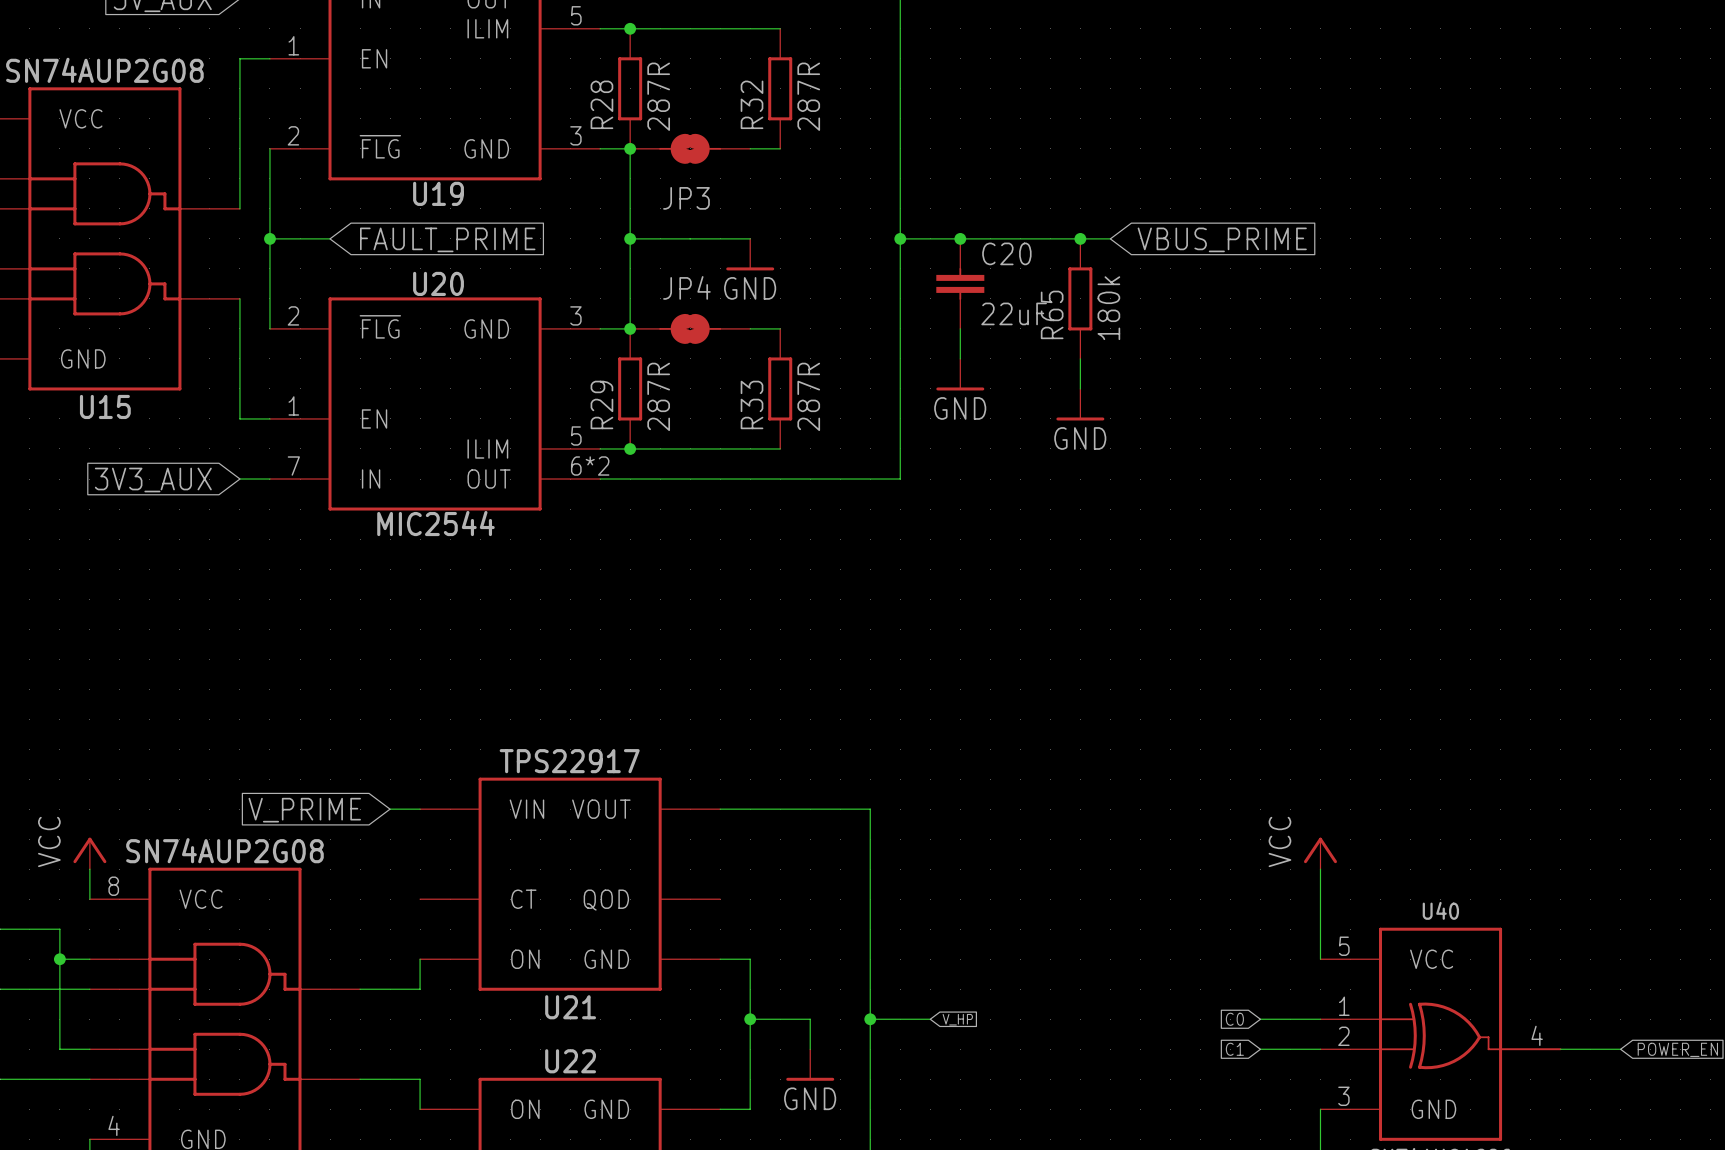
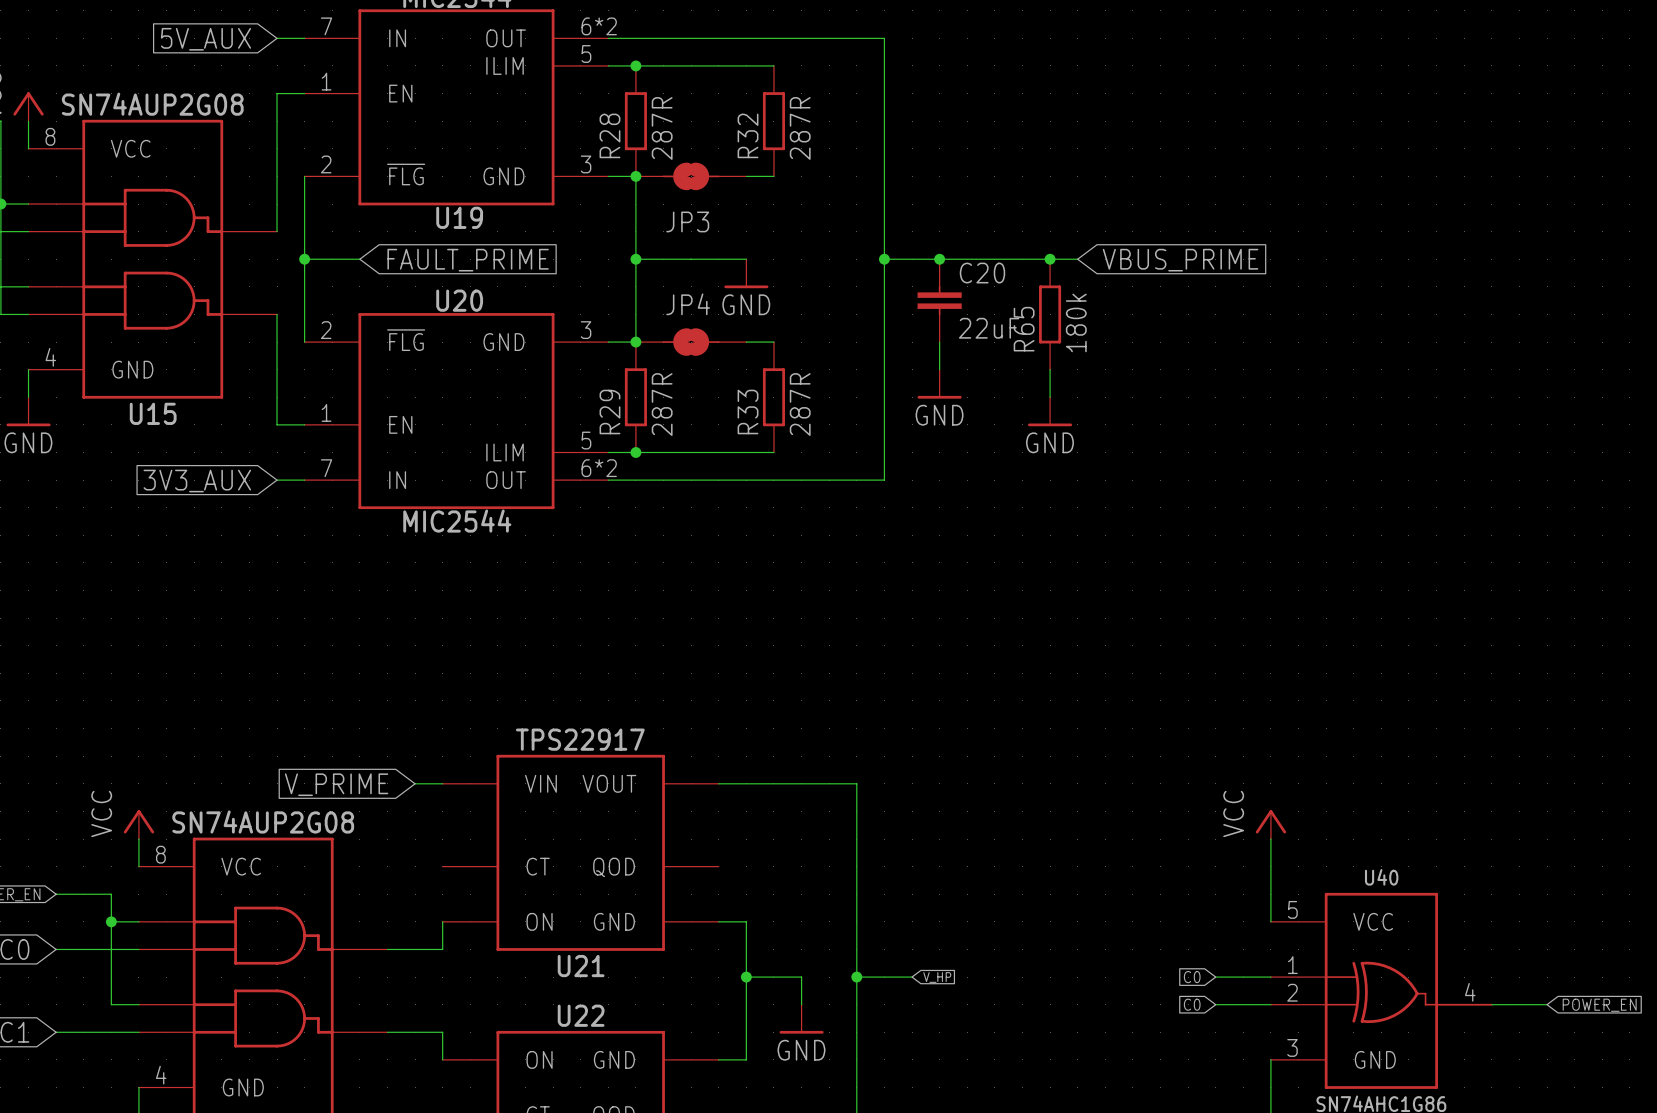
global label: C1 (1234, 1049) -> C0 (1192, 1004)

